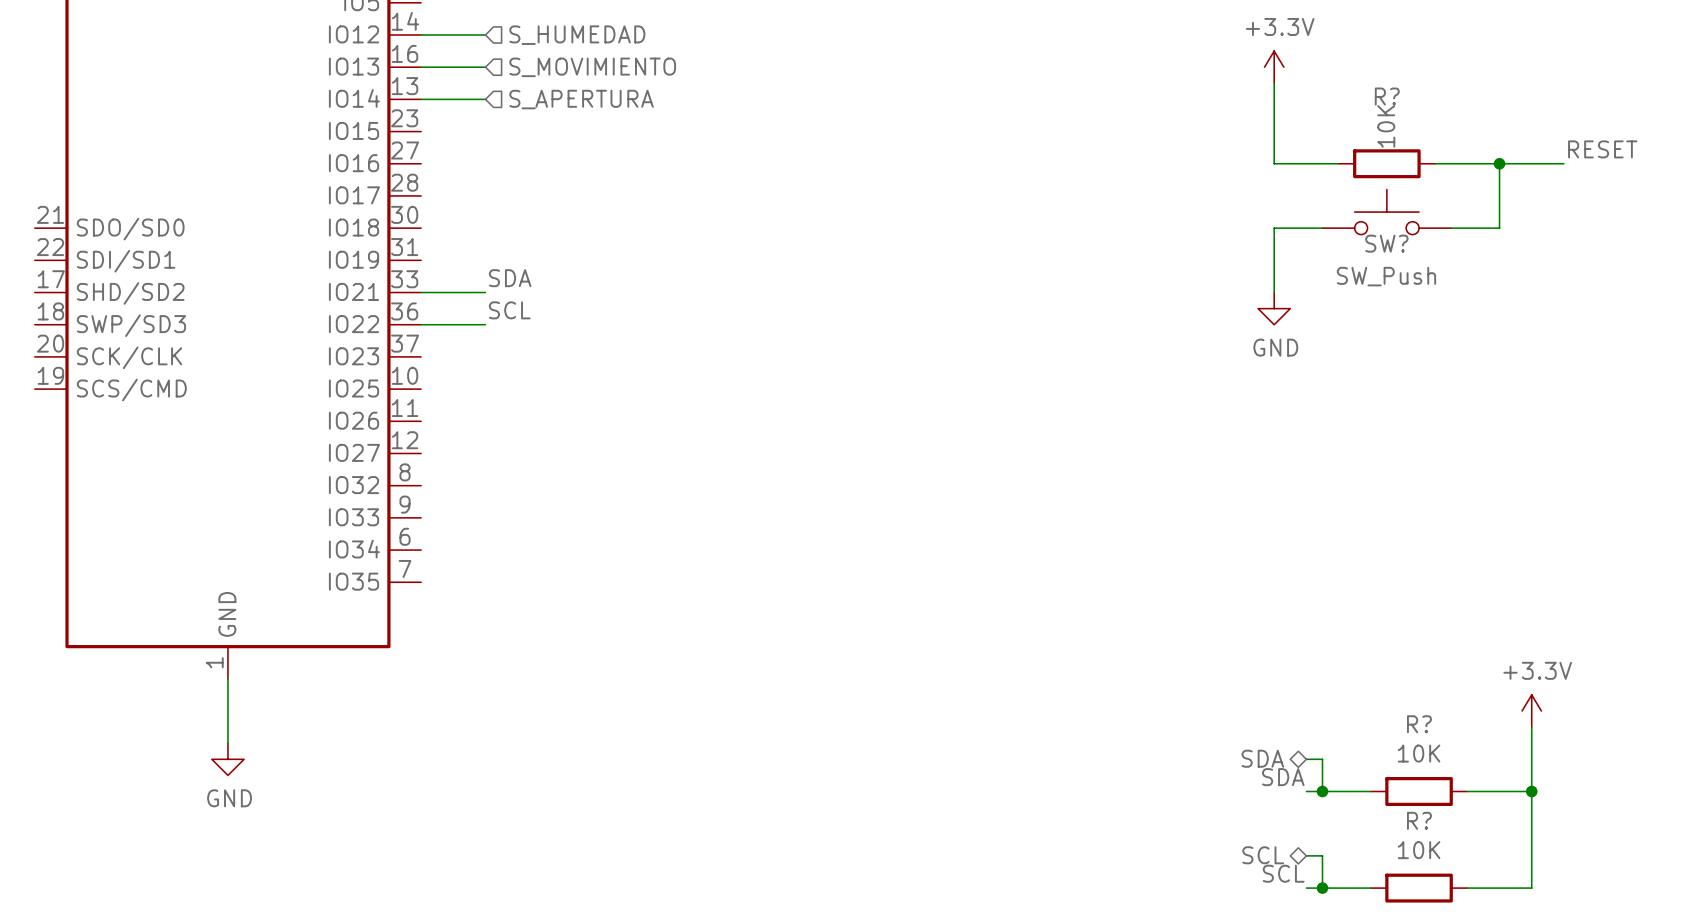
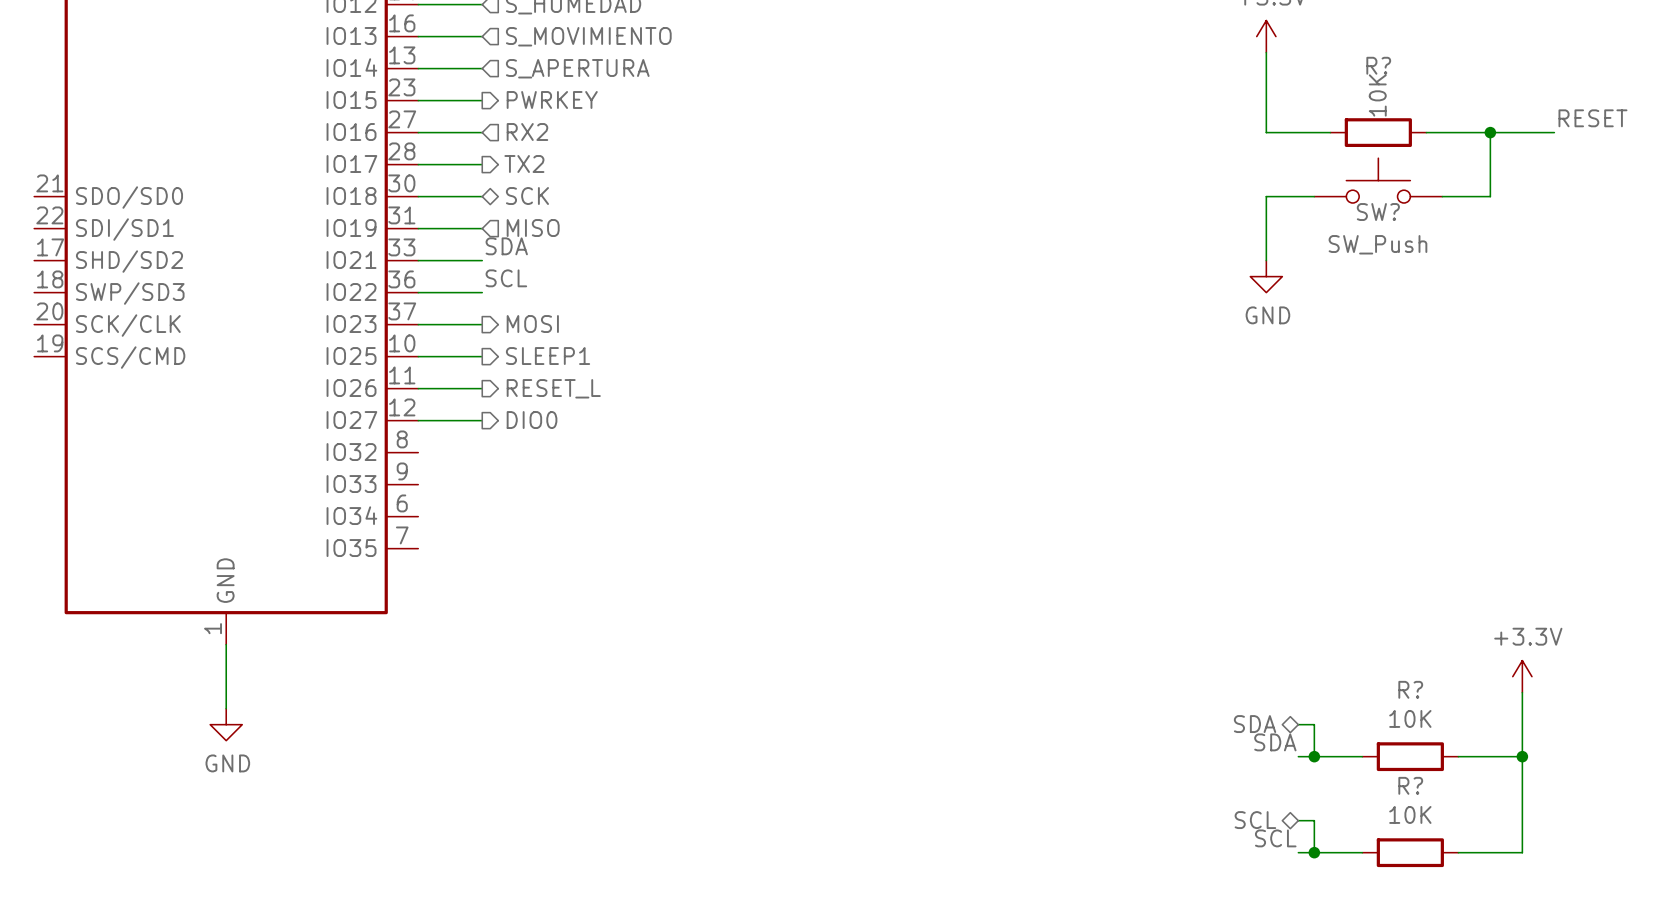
hierarchical label: none -> PWRKEY (552, 99)
wire: none -> (418, 100) (482, 100)
wire: none -> (418, 132) (482, 132)
hierarchical label: none -> RX2 (527, 132)
wire: none -> (418, 164) (482, 164)
hierarchical label: none -> TX2 (524, 164)
hierarchical label: none -> SCK (527, 196)
wire: none -> (418, 196) (482, 196)
hierarchical label: none -> MISO (533, 228)
wire: none -> (418, 228) (482, 228)
wire: none -> (418, 324) (482, 324)
hierarchical label: none -> MOSI (532, 324)
hierarchical label: none -> SLEEP1 (548, 356)
wire: none -> (418, 356) (482, 356)
wire: none -> (418, 388) (482, 388)
hierarchical label: none -> RESET_L (553, 388)
hierarchical label: none -> DIO0 (532, 420)
wire: none -> (418, 420) (482, 420)

